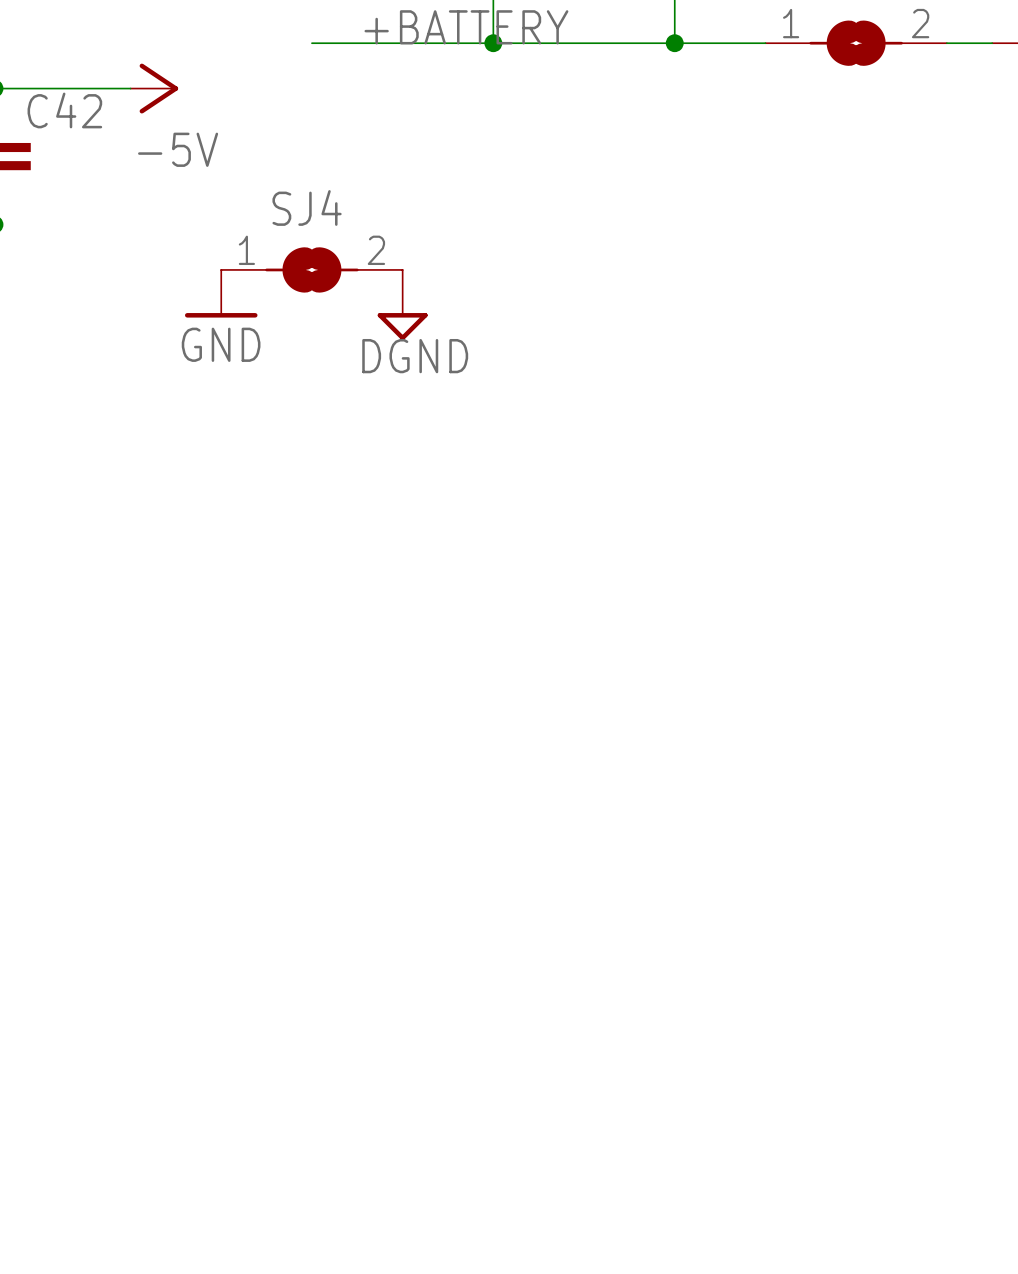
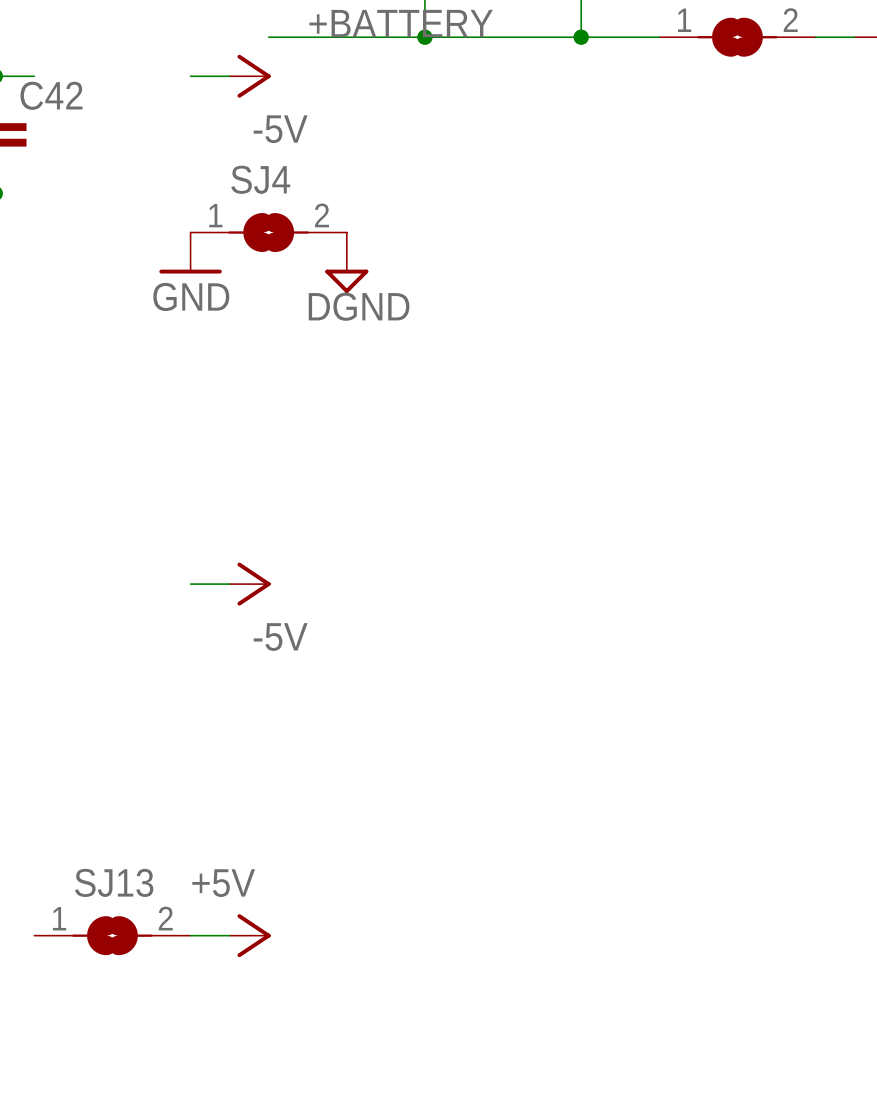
wire: (39, 88) (130, 88) -> none
power symbol position: -5V (154, 88) -> -5V (250, 76)
wire: none -> (190, 76) (229, 76)
wire: none -> (190, 584) (229, 584)
power symbol: none -> -5V (250, 584)
SJ13: none -> (112, 935)
wire: none -> (190, 935) (229, 935)
power symbol: none -> +5V (250, 935)

